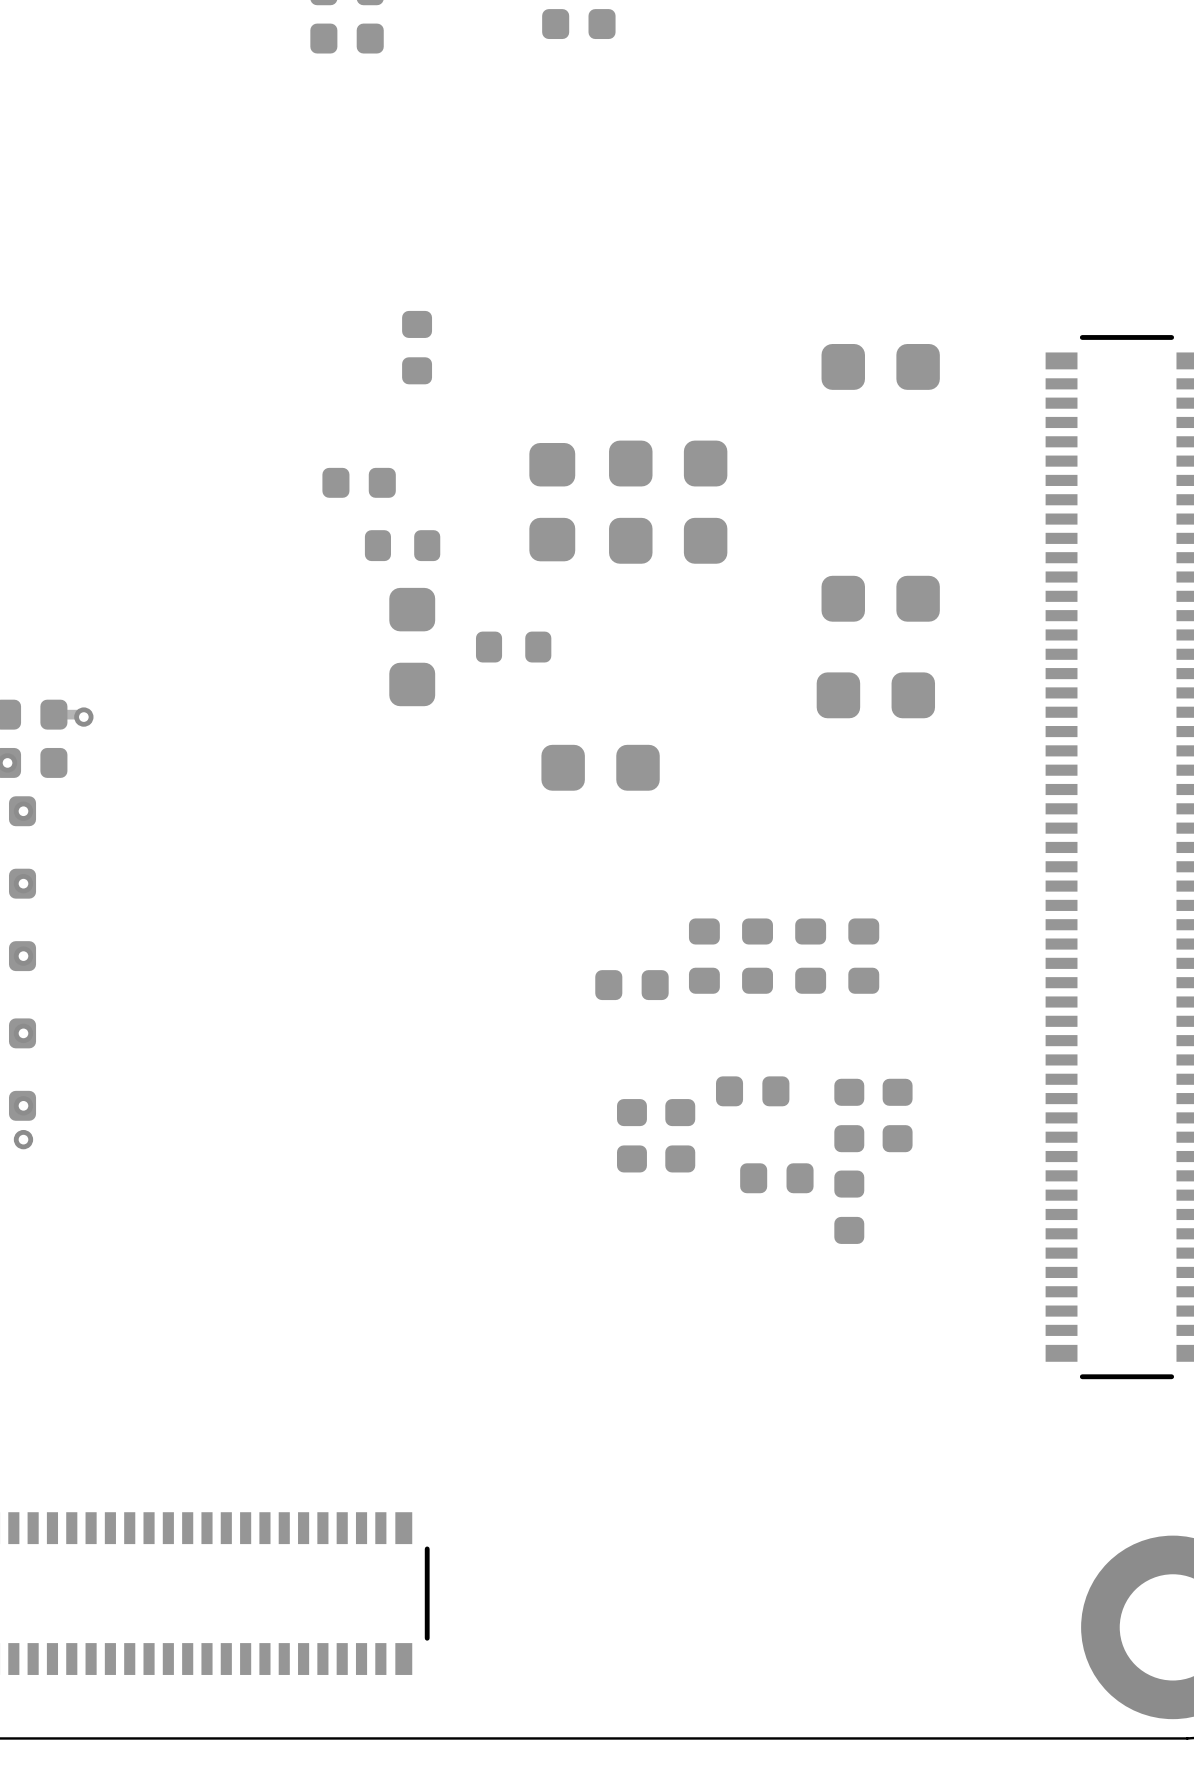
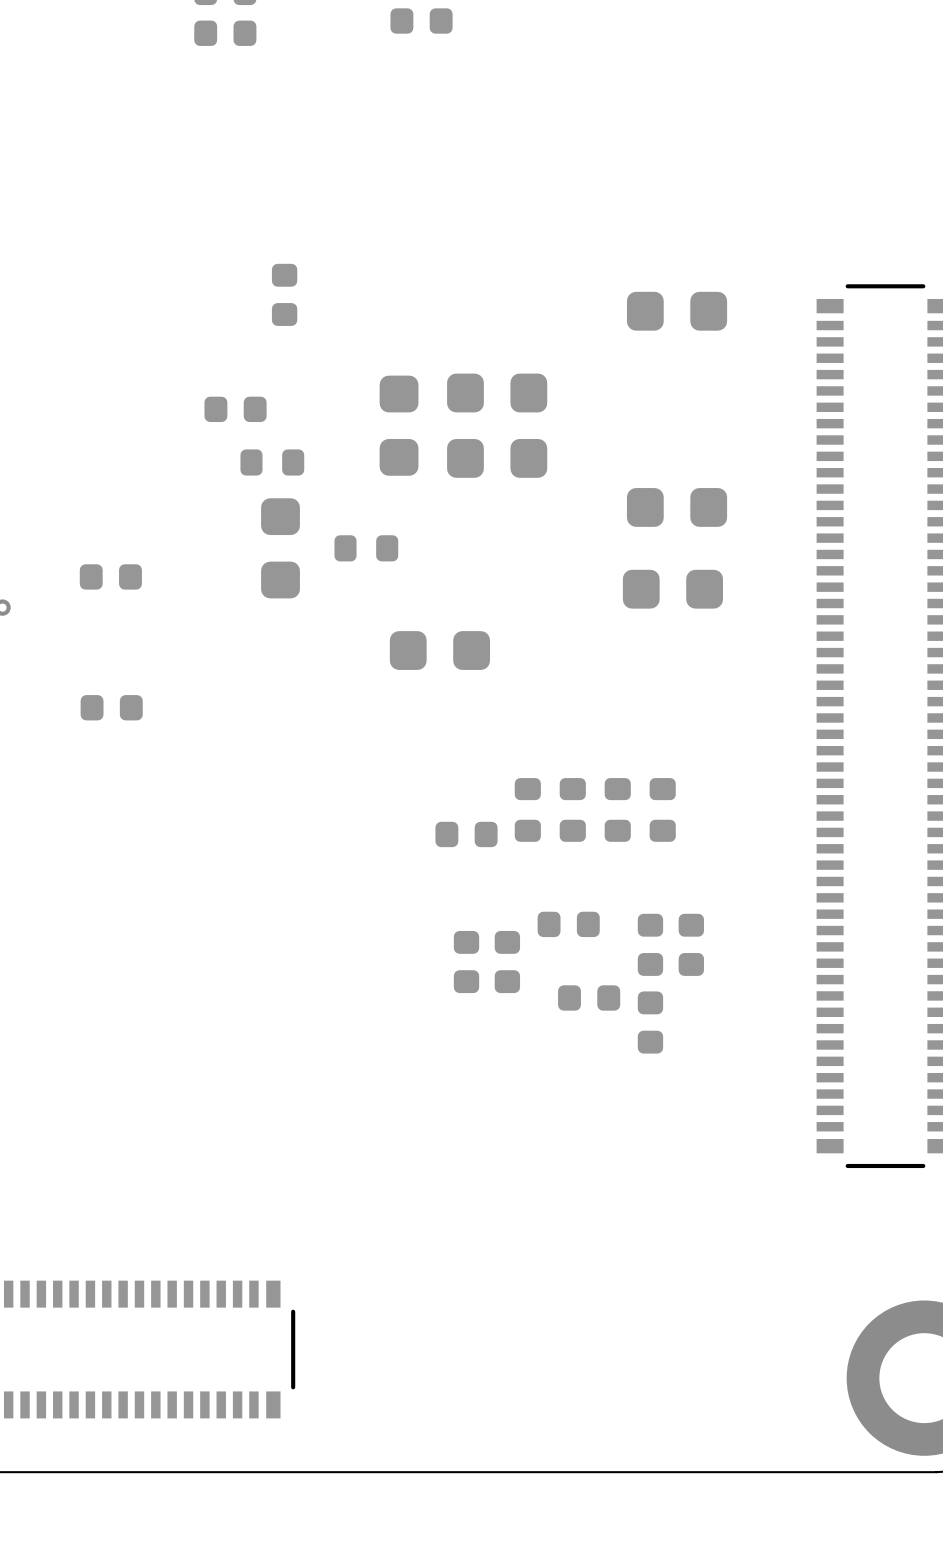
part: none -> (110, 576)
part: none -> (111, 707)

